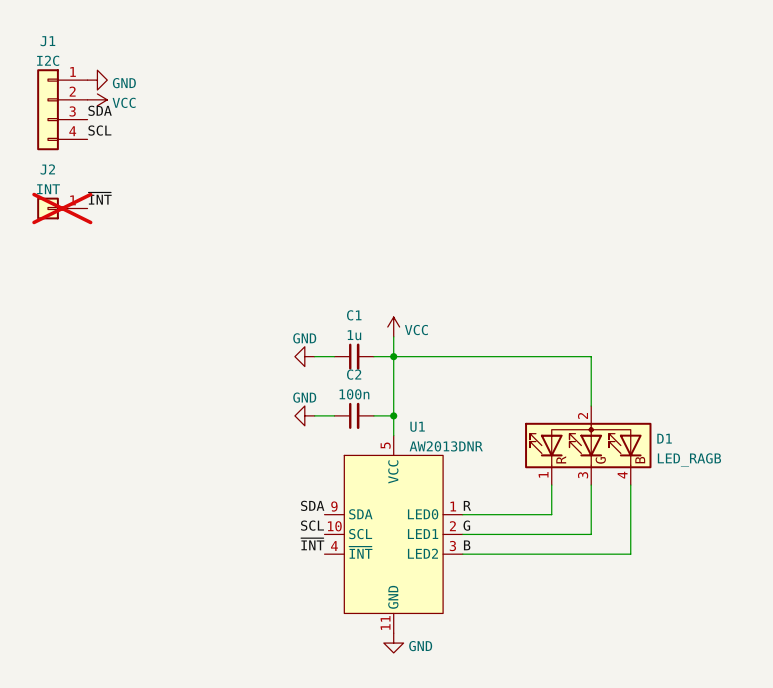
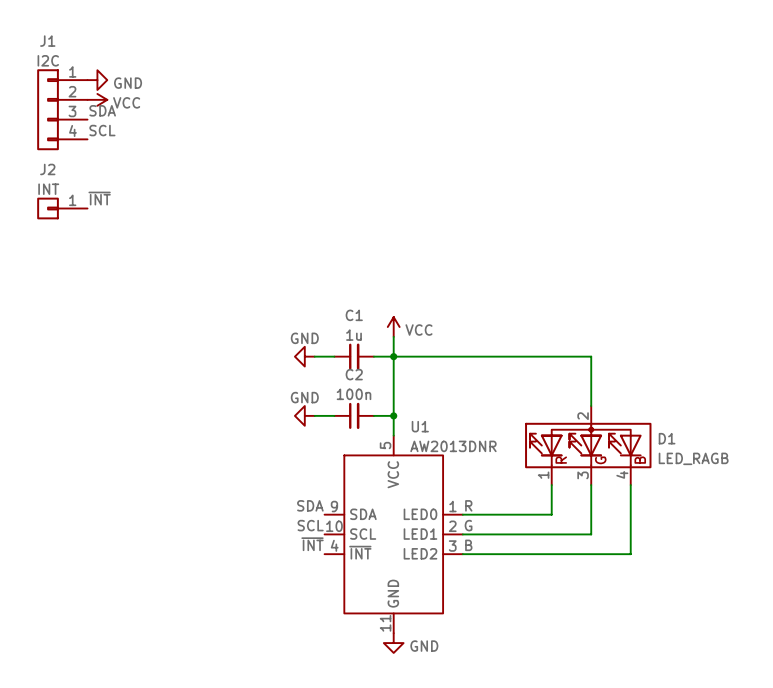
J2 do-not-place cross: (62, 208) -> none

